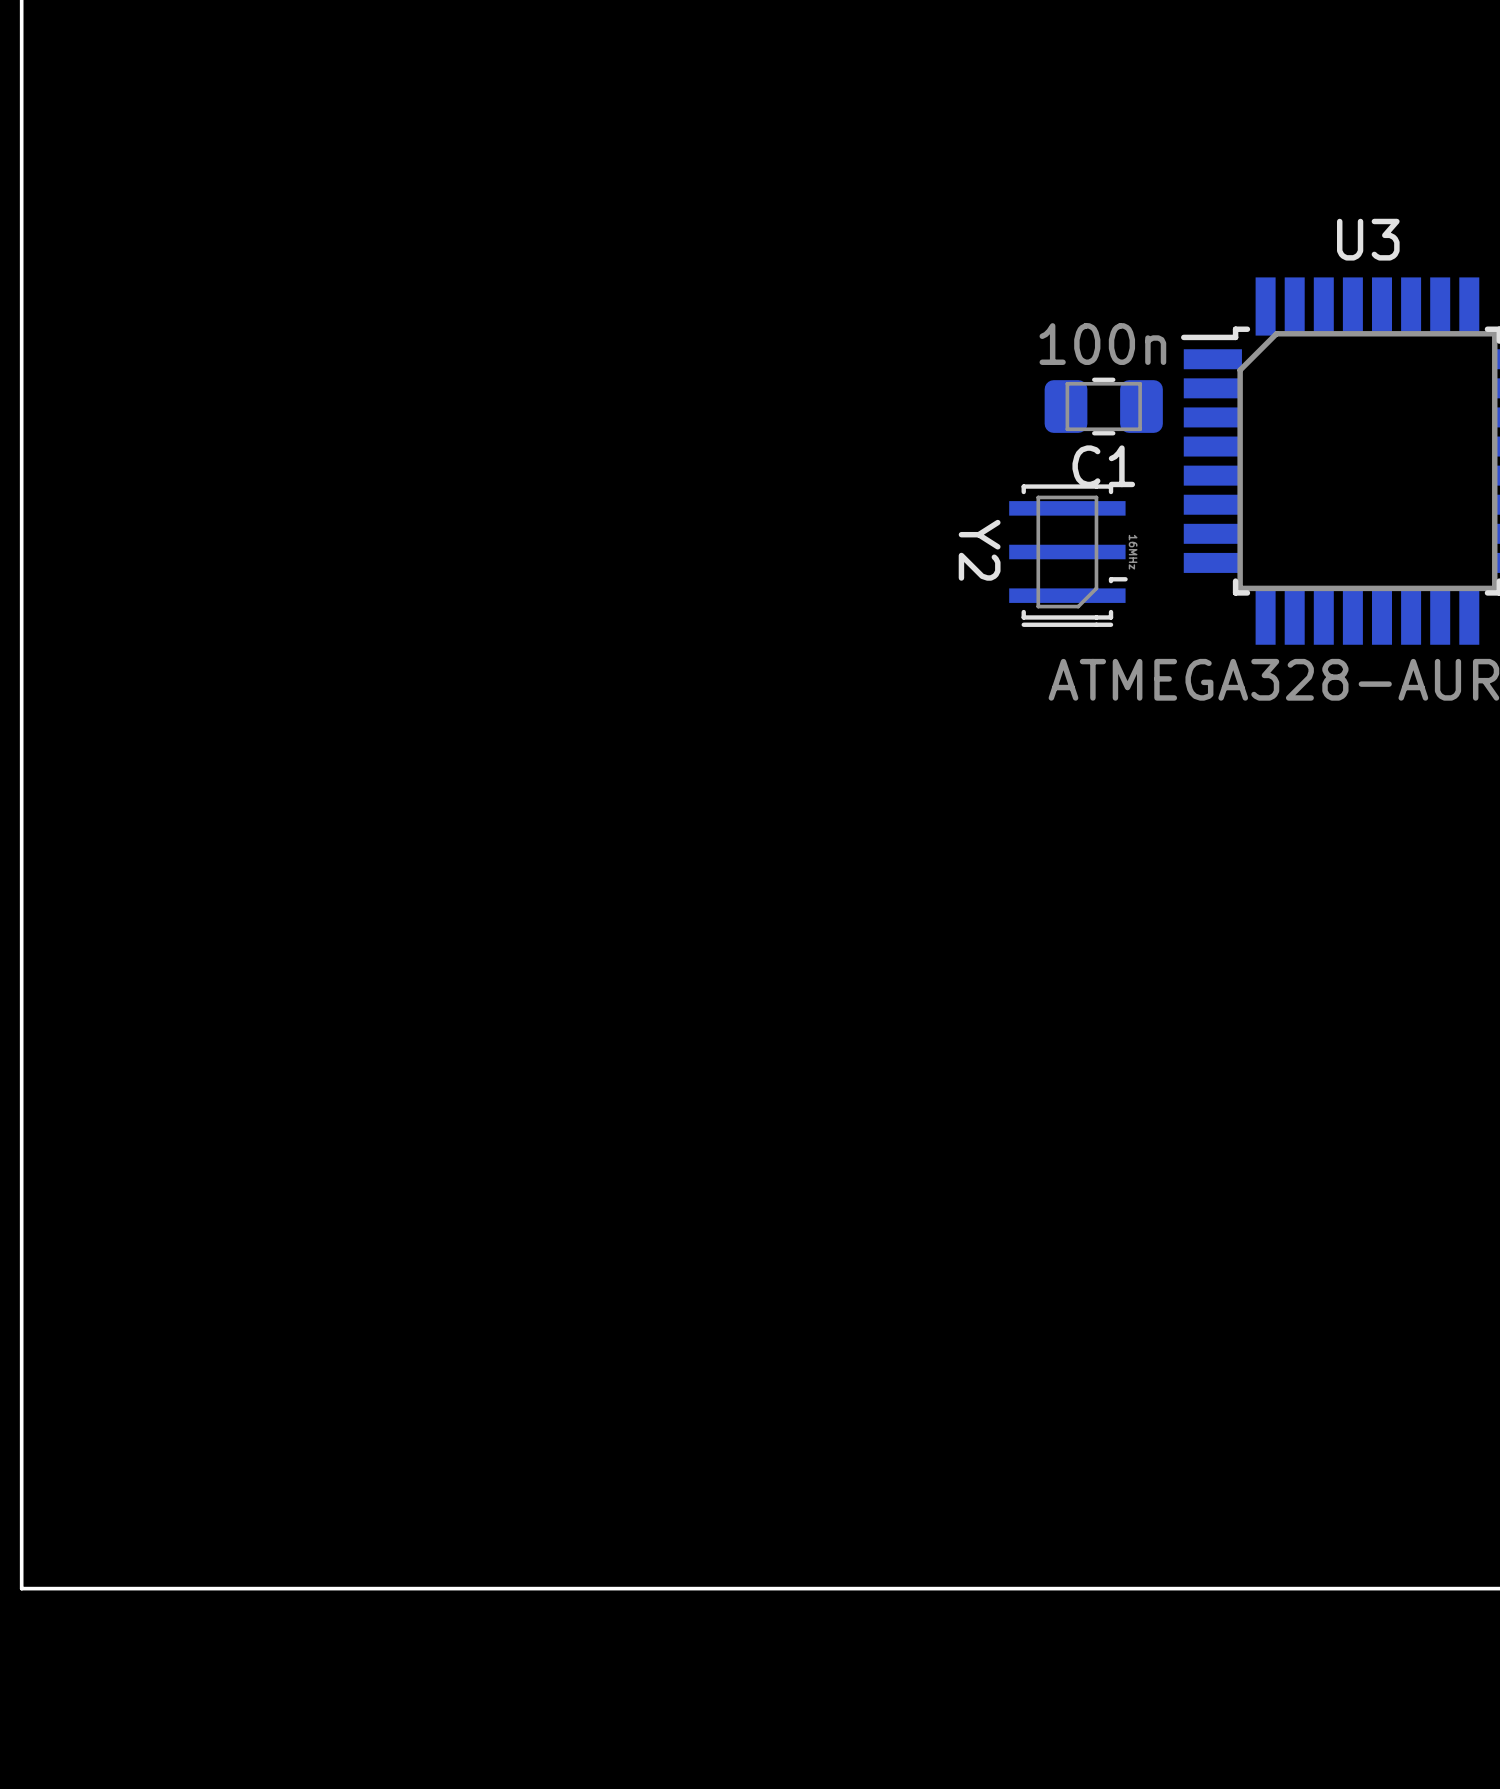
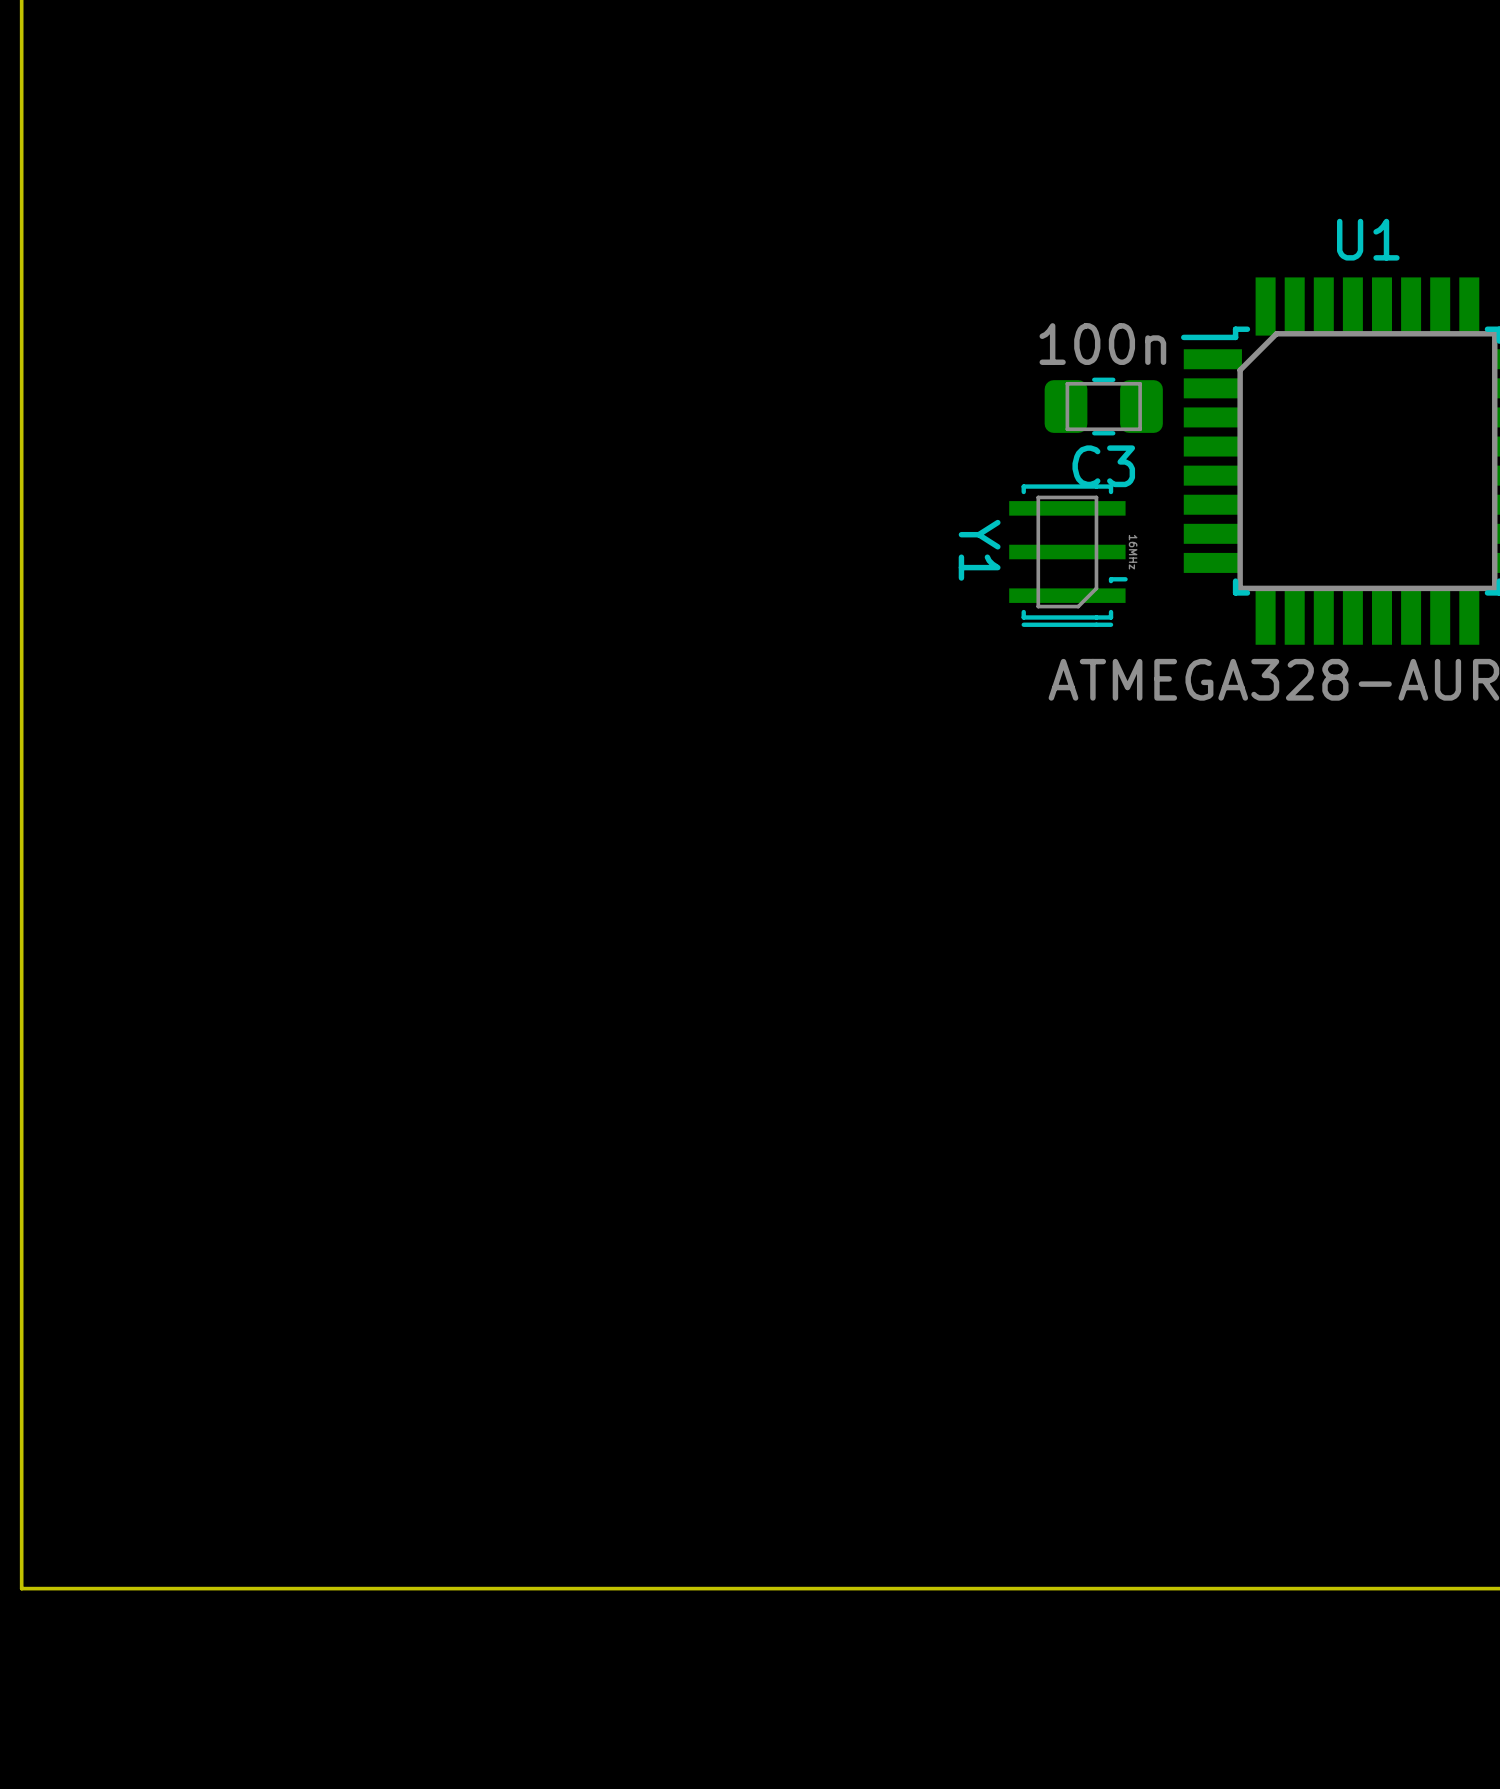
U3 name: U3 (1368, 239) -> U1 (1368, 239)
C1 name: C1 (1103, 466) -> C3 (1103, 466)
Y2 name: Y2 (979, 550) -> Y1 (979, 550)

